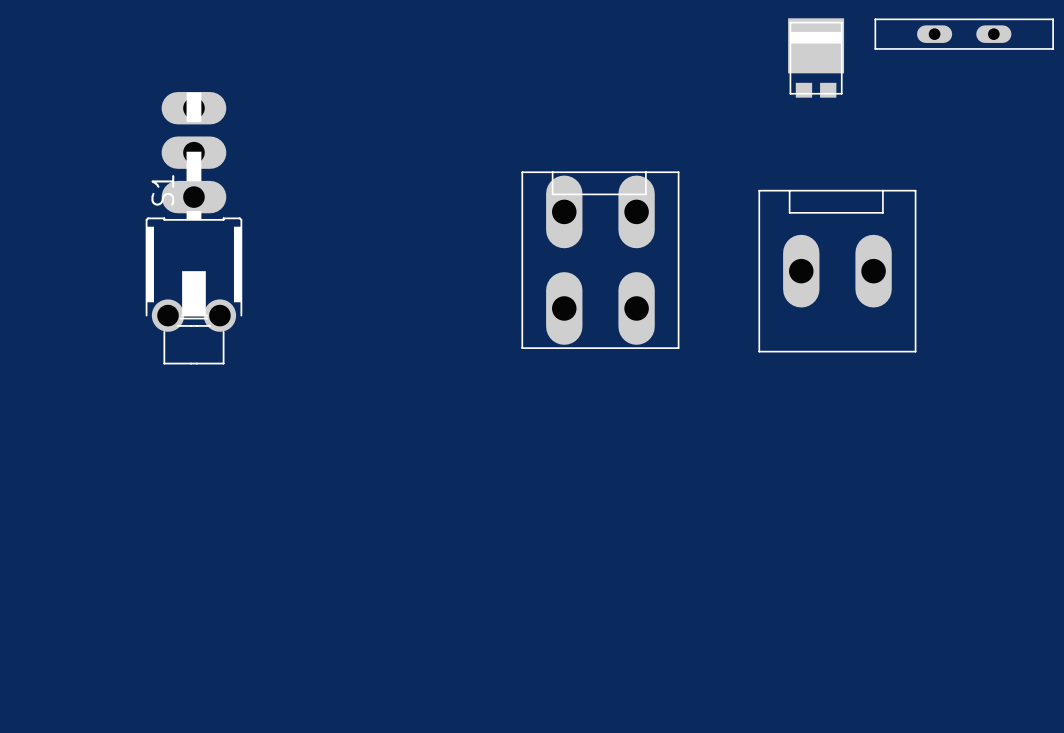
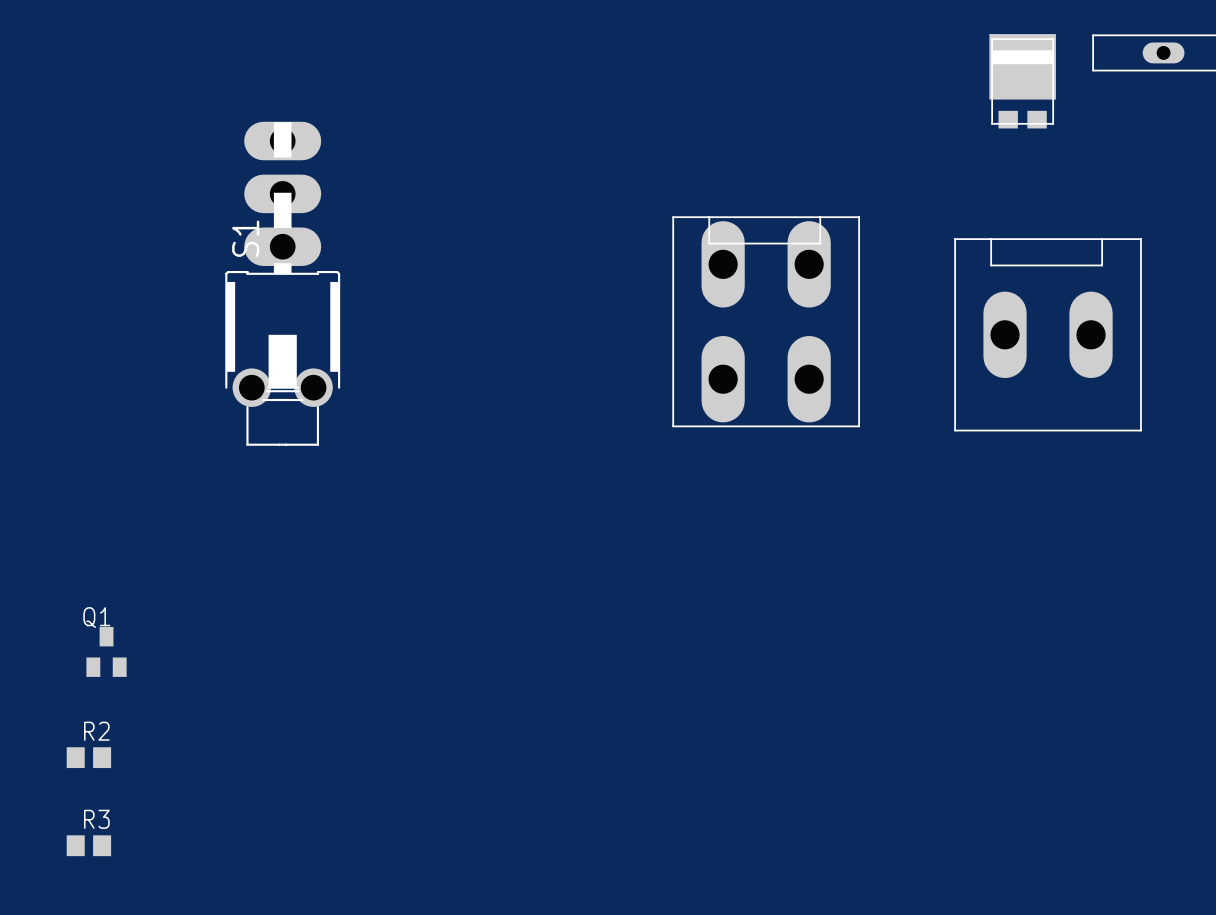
Q1: none -> (106, 651)
R2: none -> (88, 757)
R3: none -> (88, 845)

